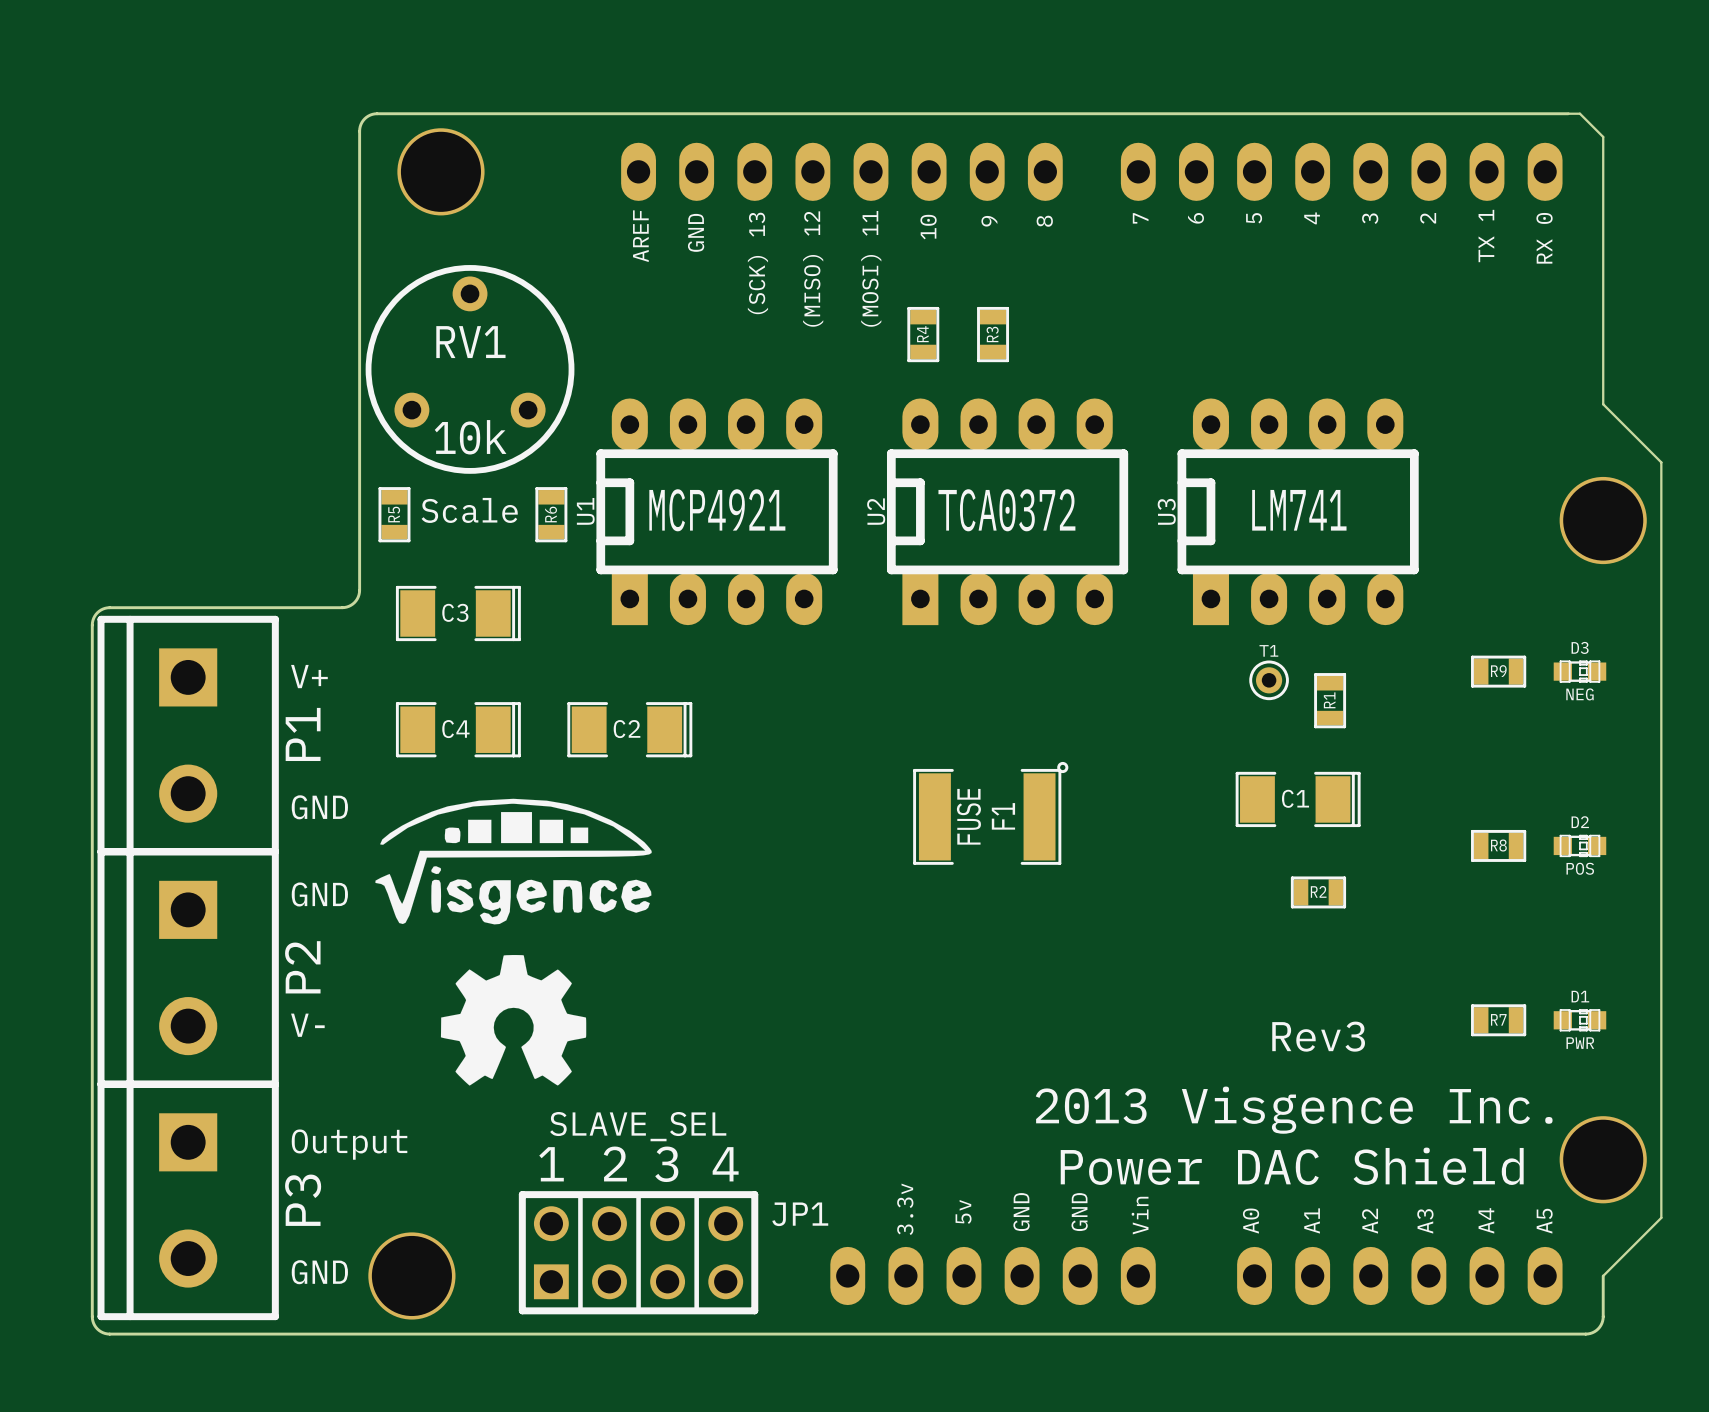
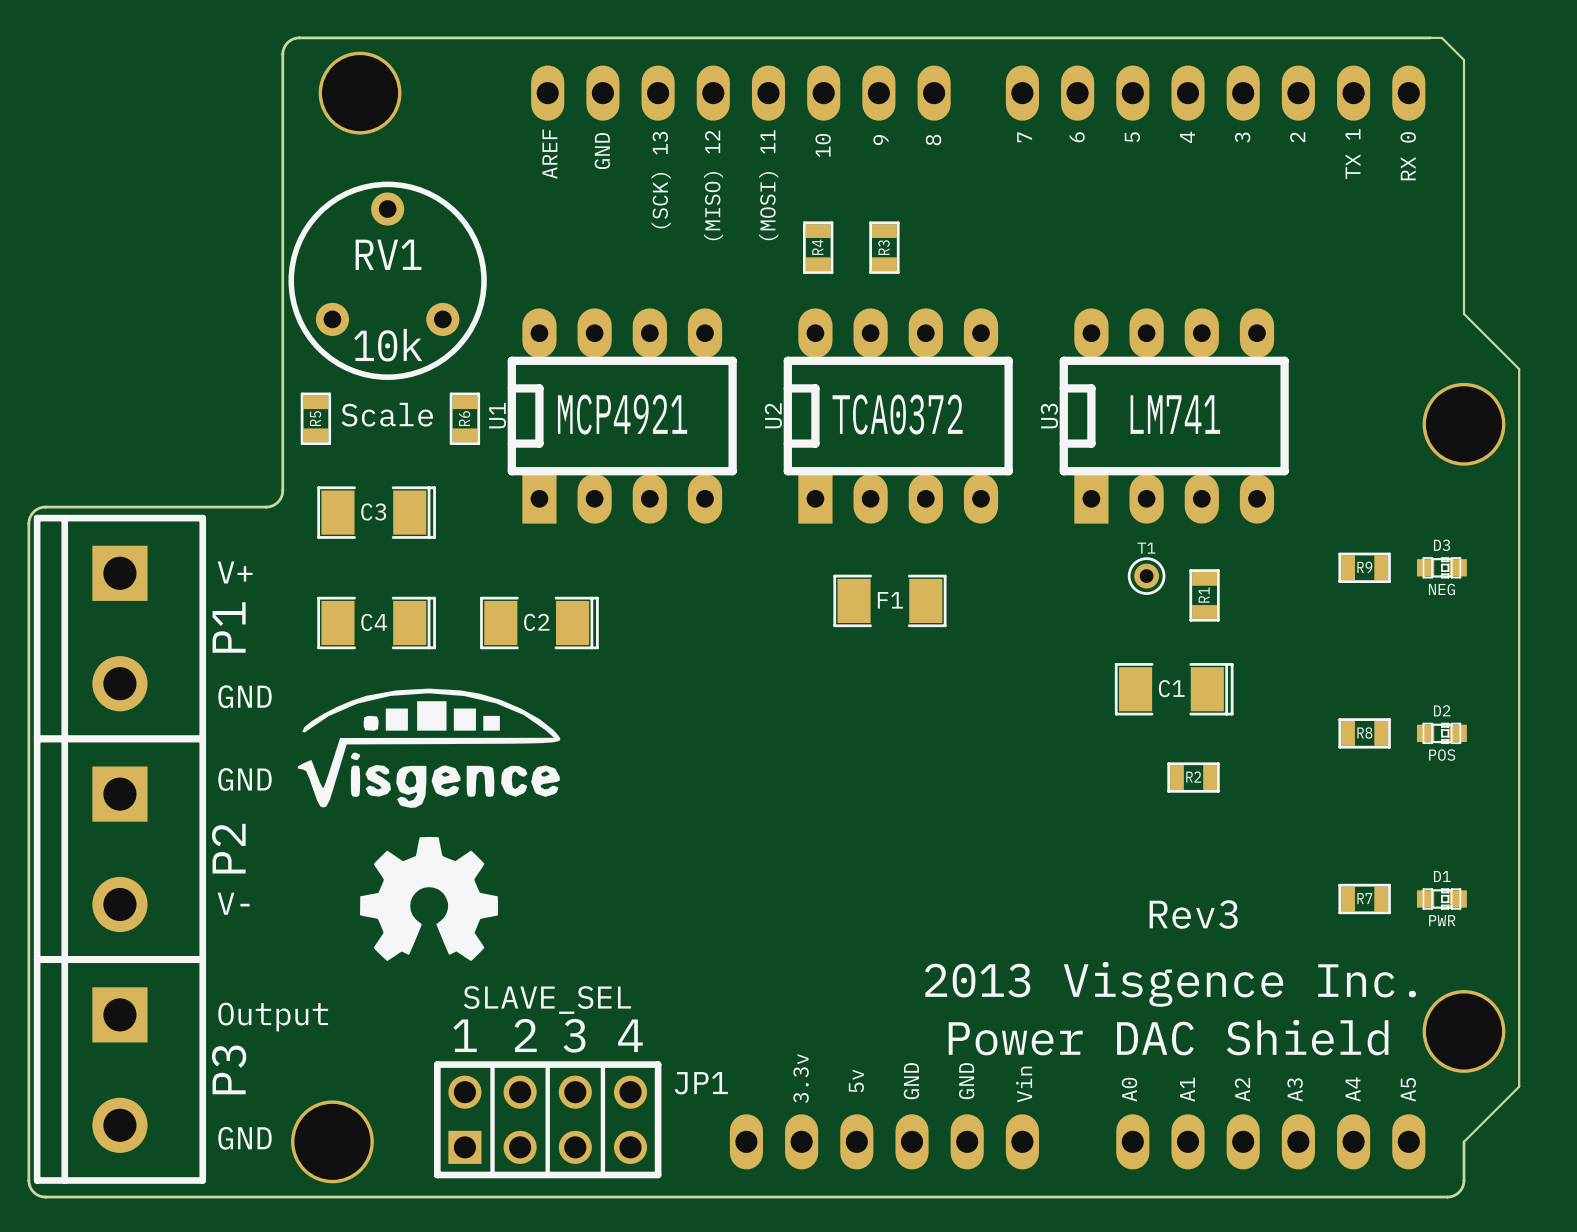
F1 footprint: [913, 761, 1069, 865] -> [833, 574, 947, 628]
F1 value: FUSE (968, 816) -> none

